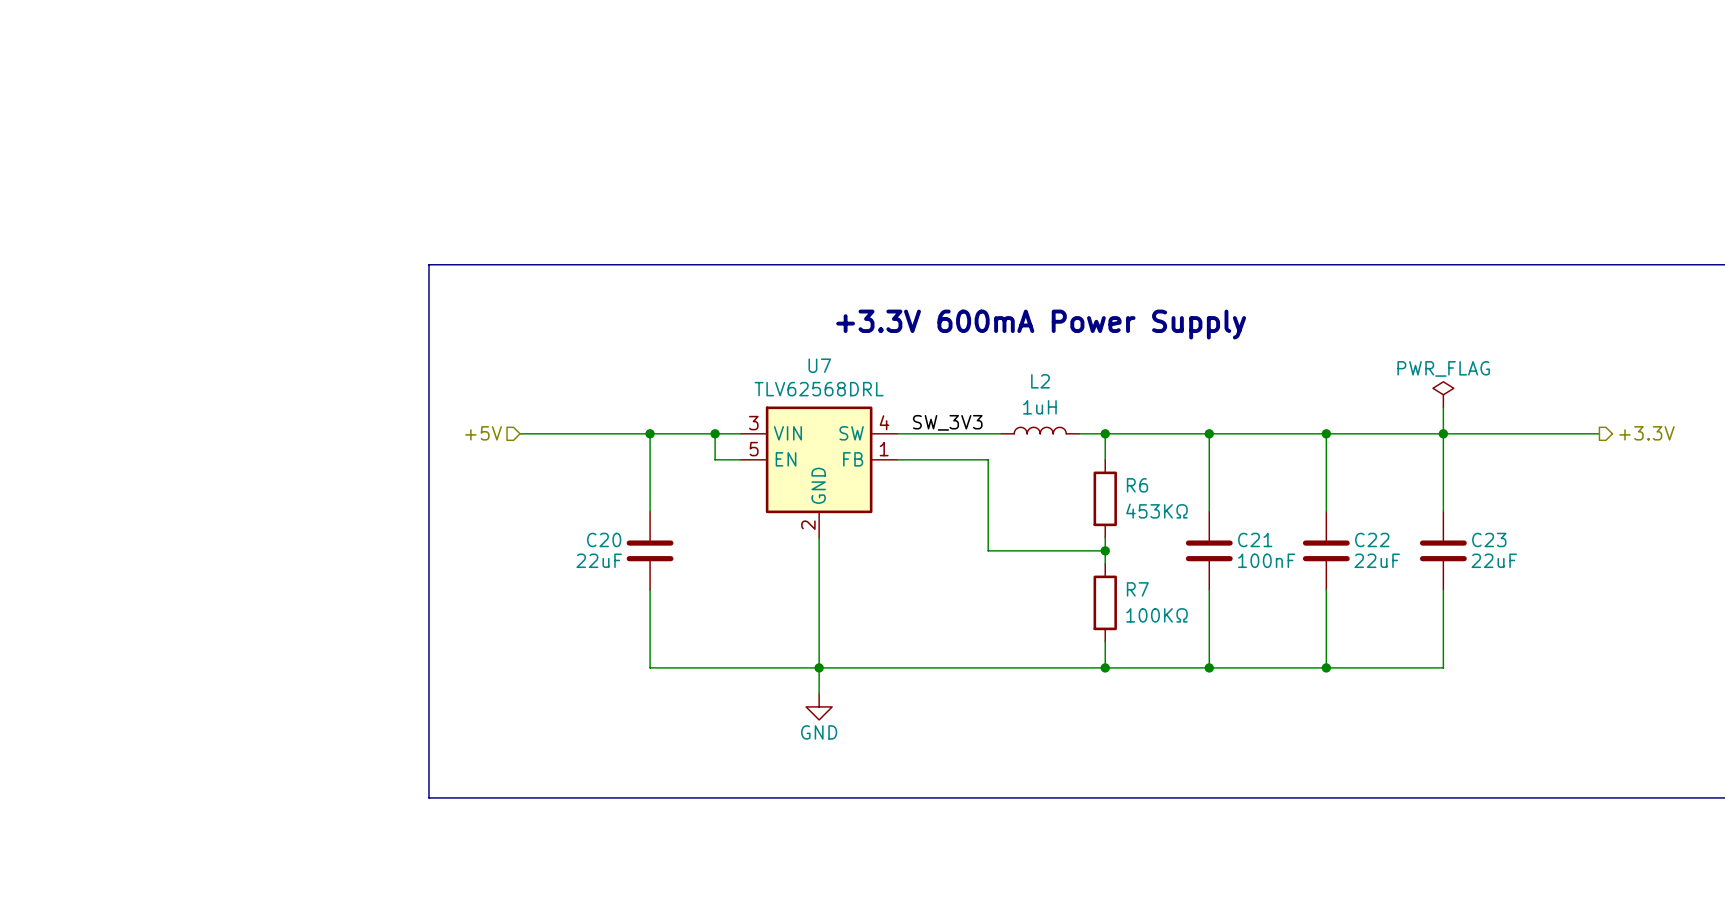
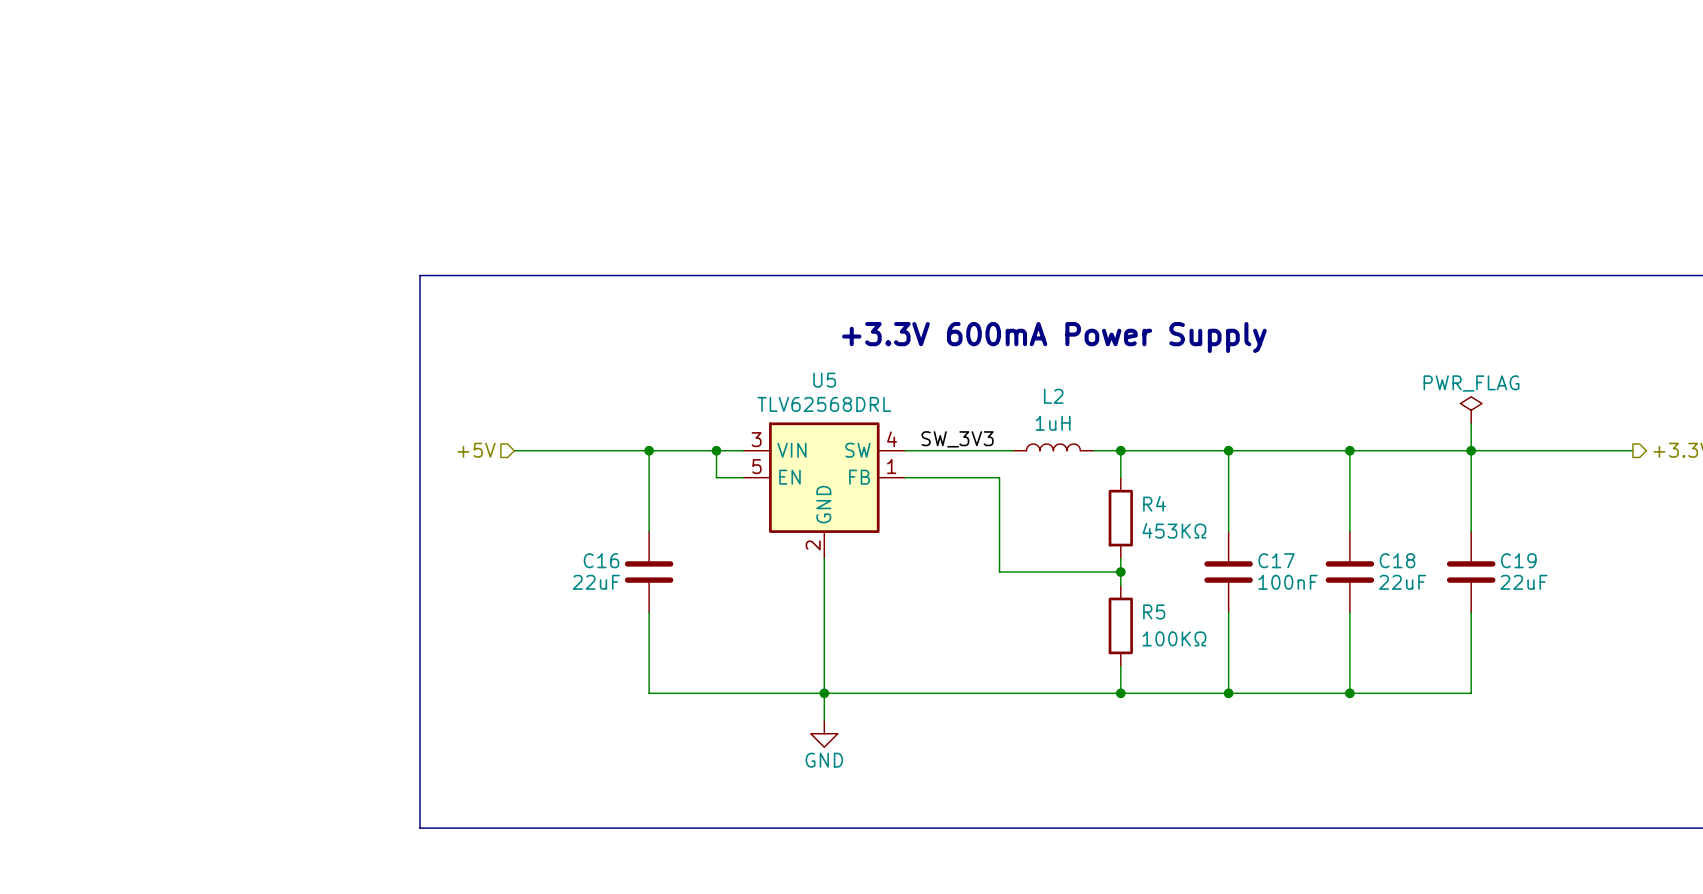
U7 name: U7 (819, 365) -> U5 (824, 380)
R6 name: R6 (1137, 485) -> R4 (1154, 503)
C20 name: C20 (604, 539) -> C16 (601, 560)
C21 name: C21 (1255, 539) -> C17 (1276, 560)
C22 name: C22 (1372, 539) -> C18 (1397, 560)
C23 name: C23 (1489, 539) -> C19 (1518, 560)
R7 name: R7 (1137, 589) -> R5 (1154, 611)

